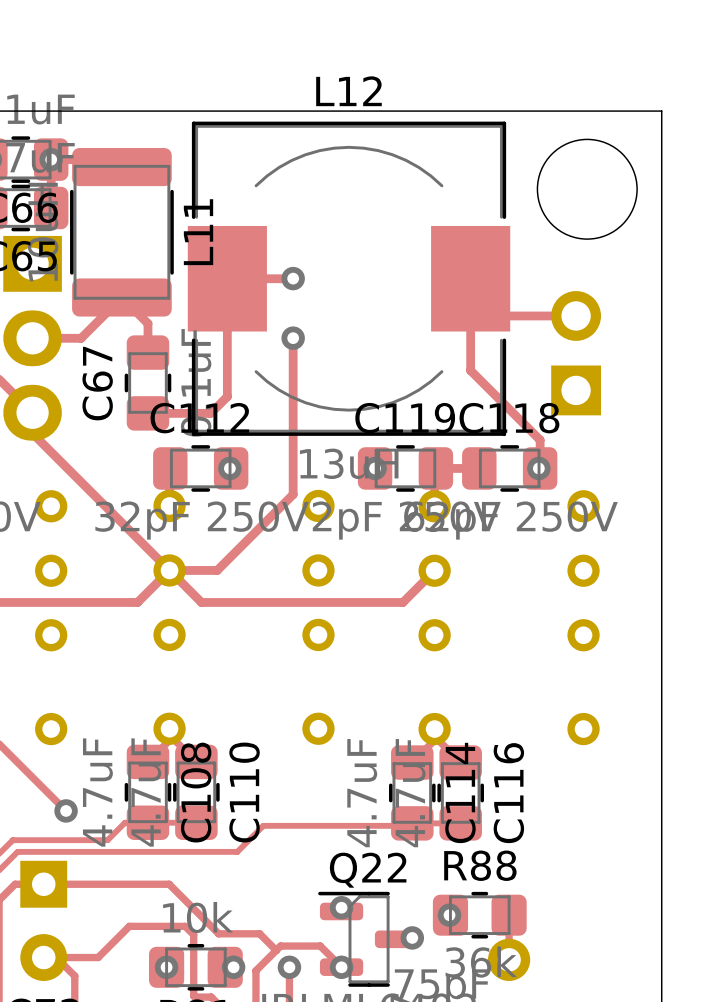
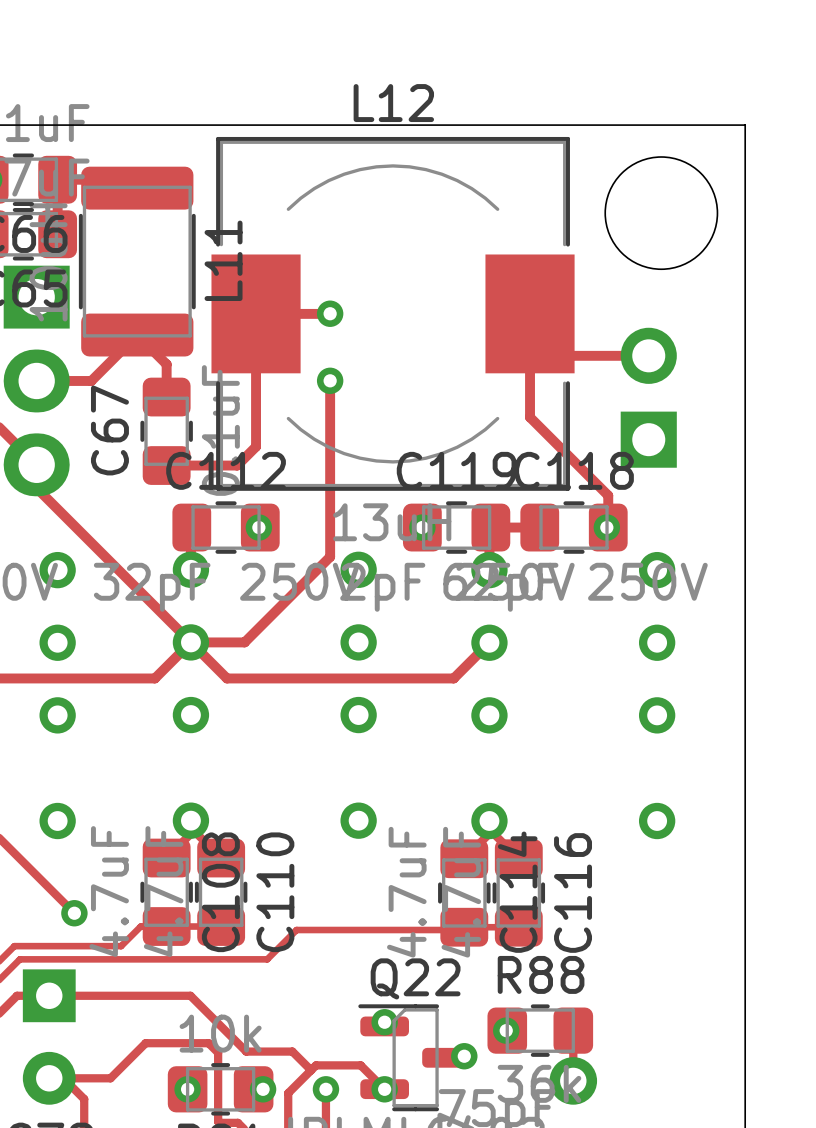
via: (51, 159) -> none

